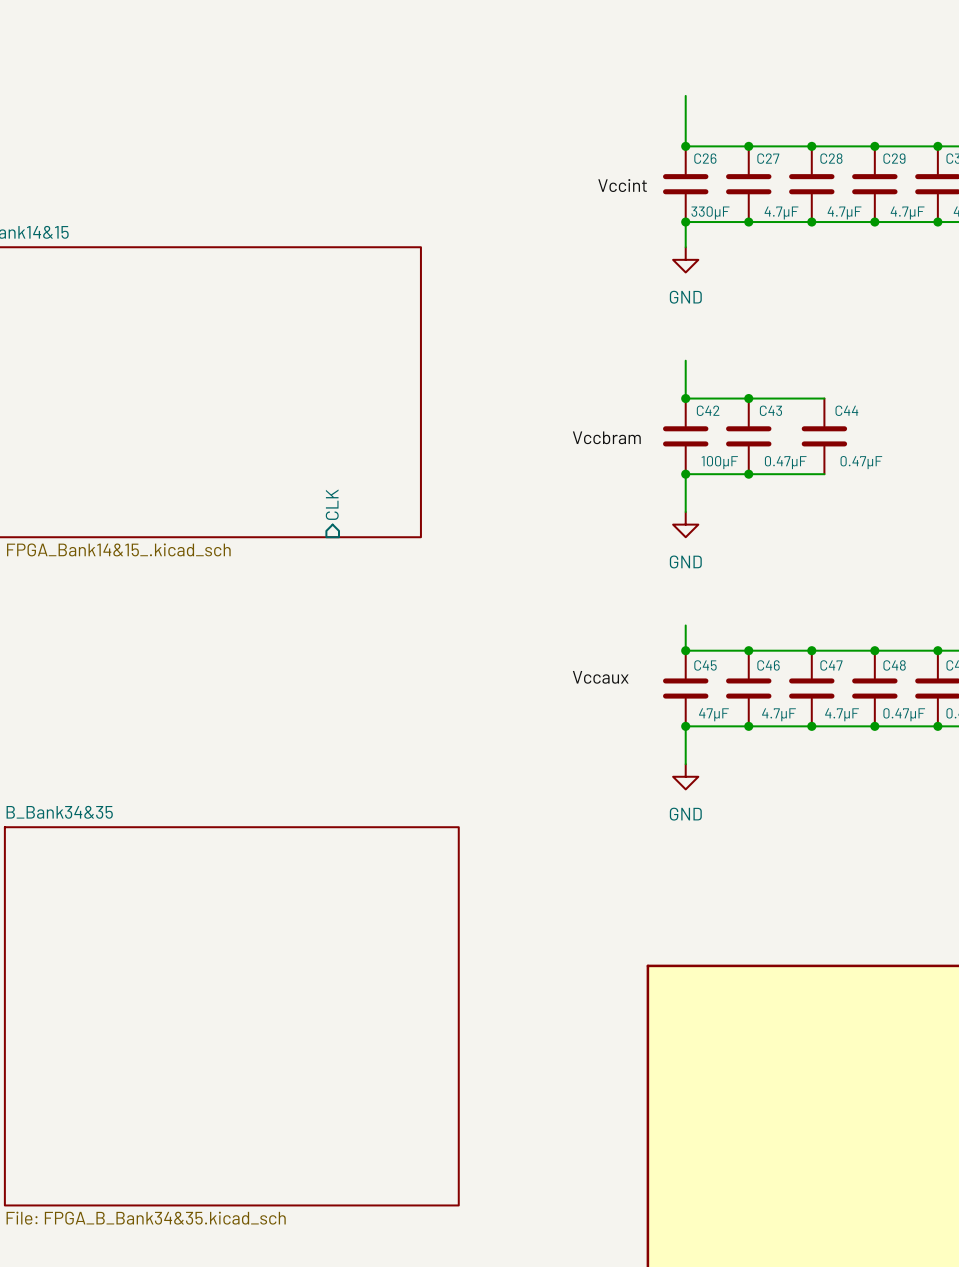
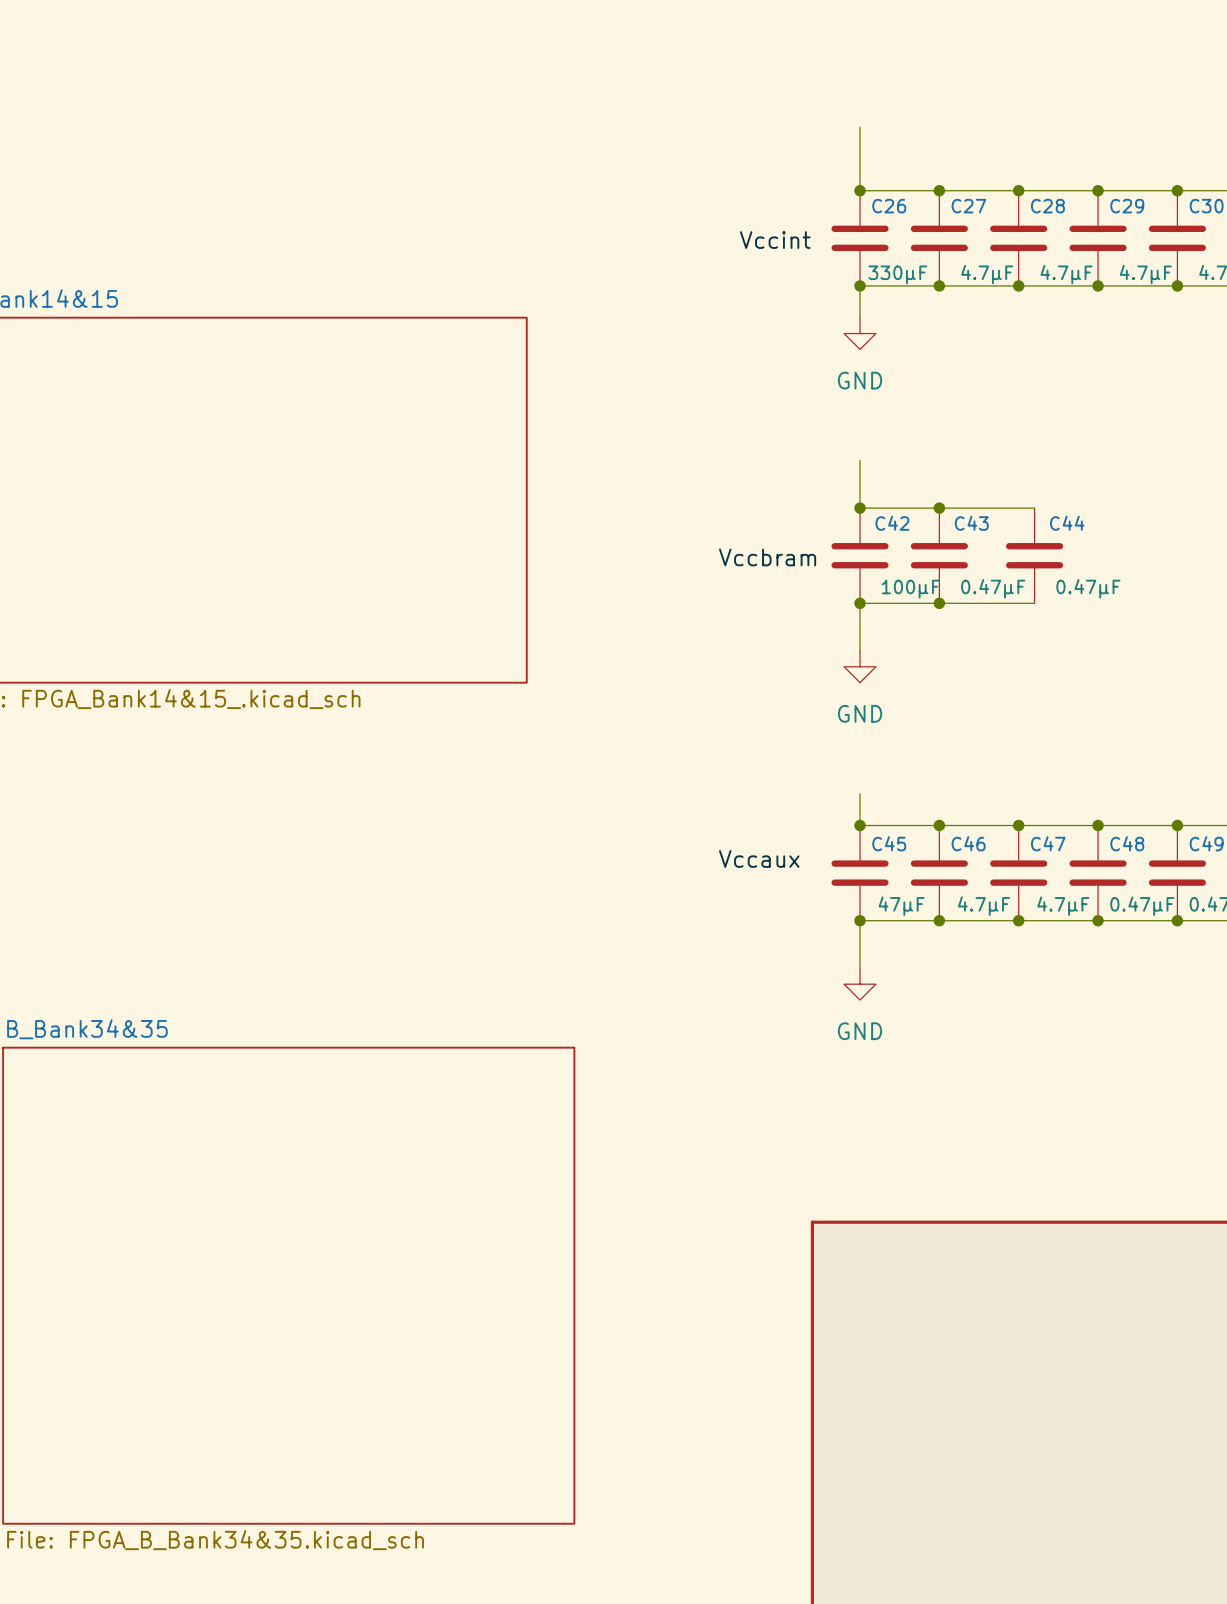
sheet pin: CLK (332, 504) -> none

